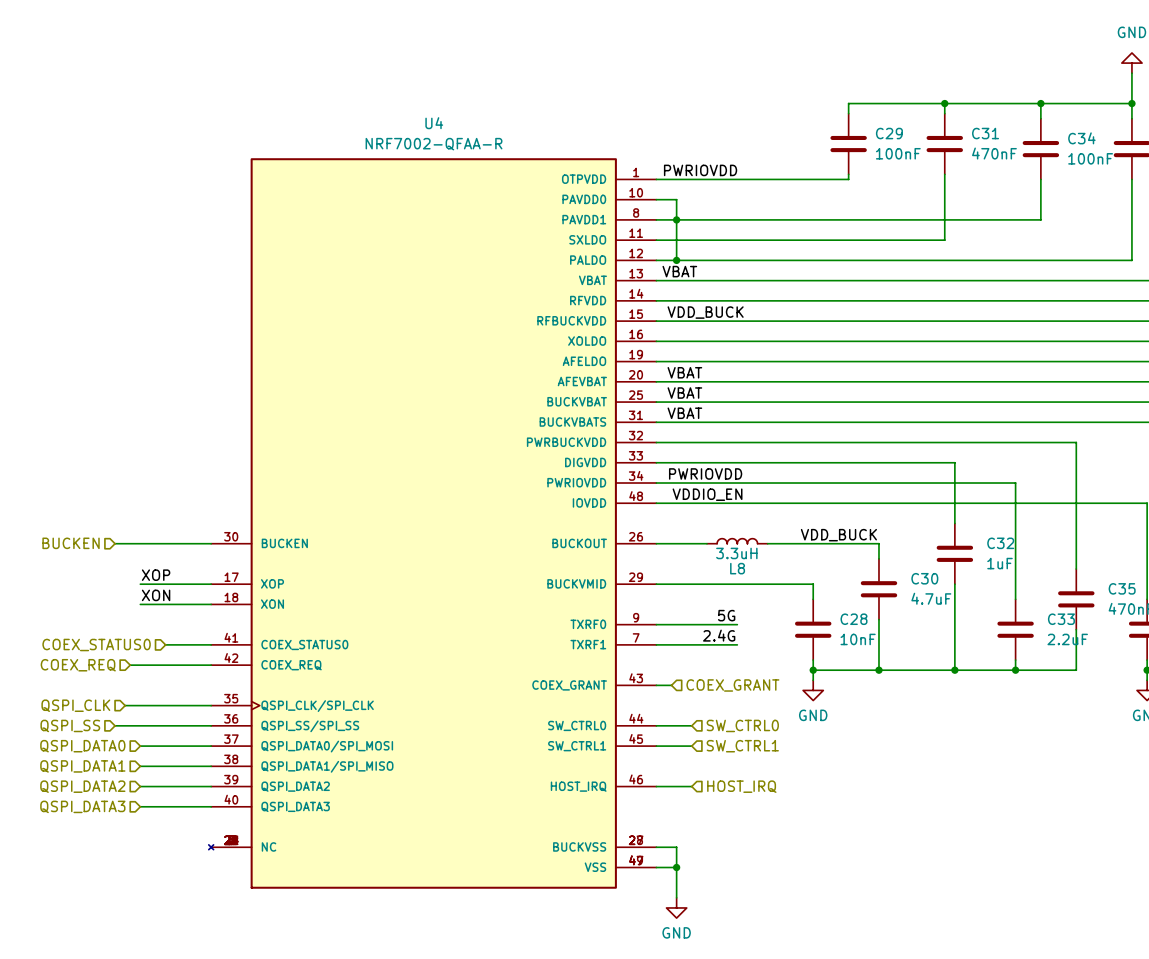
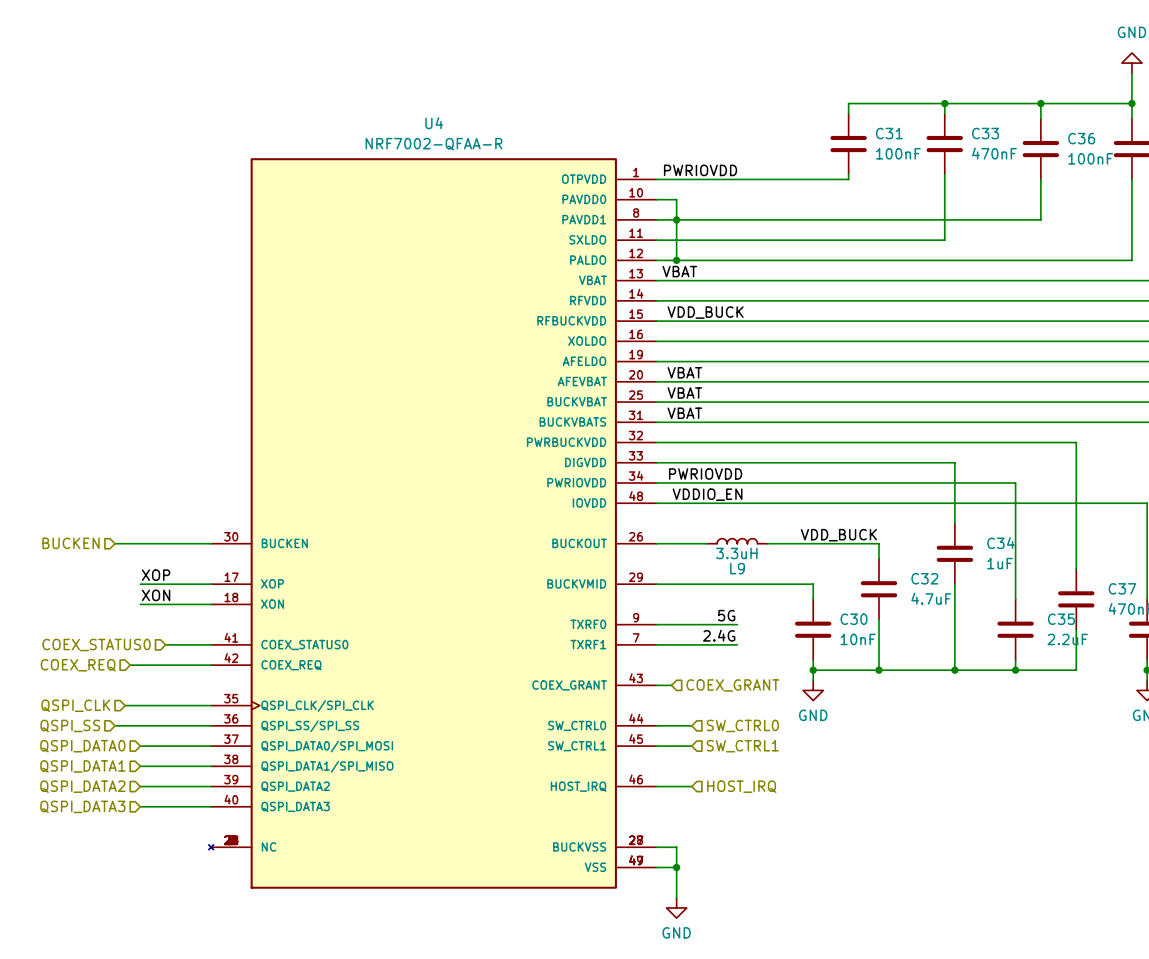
C29 name: C29 (889, 133) -> C31 (889, 133)
C31 name: C31 (985, 133) -> C33 (985, 133)
C34 name: C34 (1081, 138) -> C36 (1081, 138)
C32 name: C32 (1000, 543) -> C34 (1000, 543)
L8 name: L8 (737, 568) -> L9 (737, 568)
C30 name: C30 (924, 578) -> C32 (924, 578)
C35 name: C35 (1122, 588) -> C37 (1122, 588)
C28 name: C28 (854, 619) -> C30 (854, 619)
C33 name: C33 (1061, 619) -> C35 (1061, 619)

